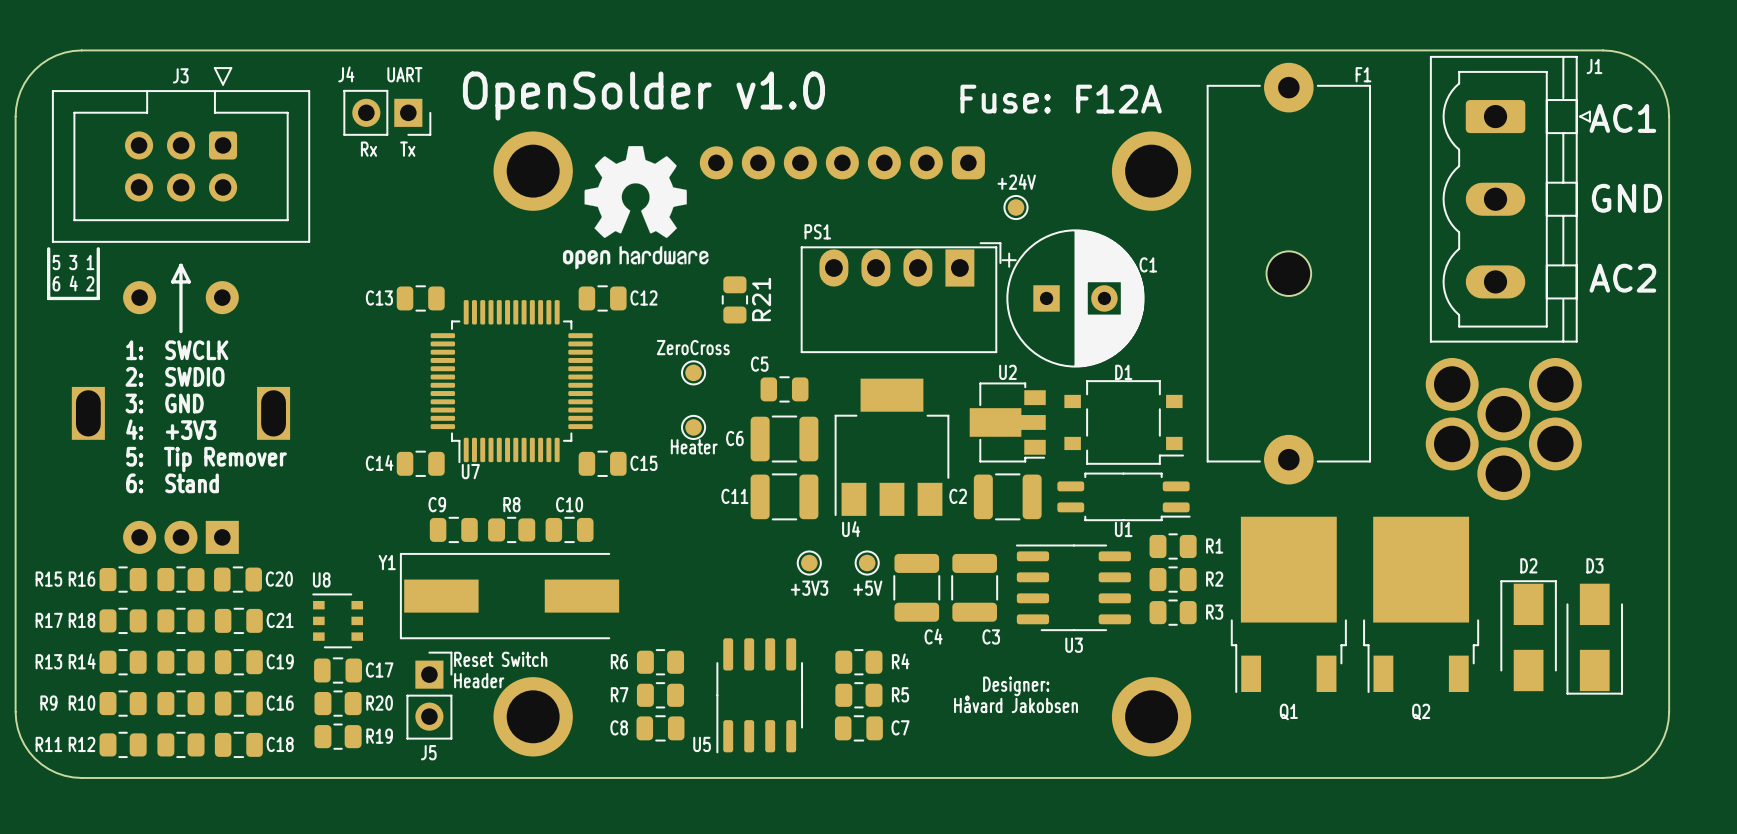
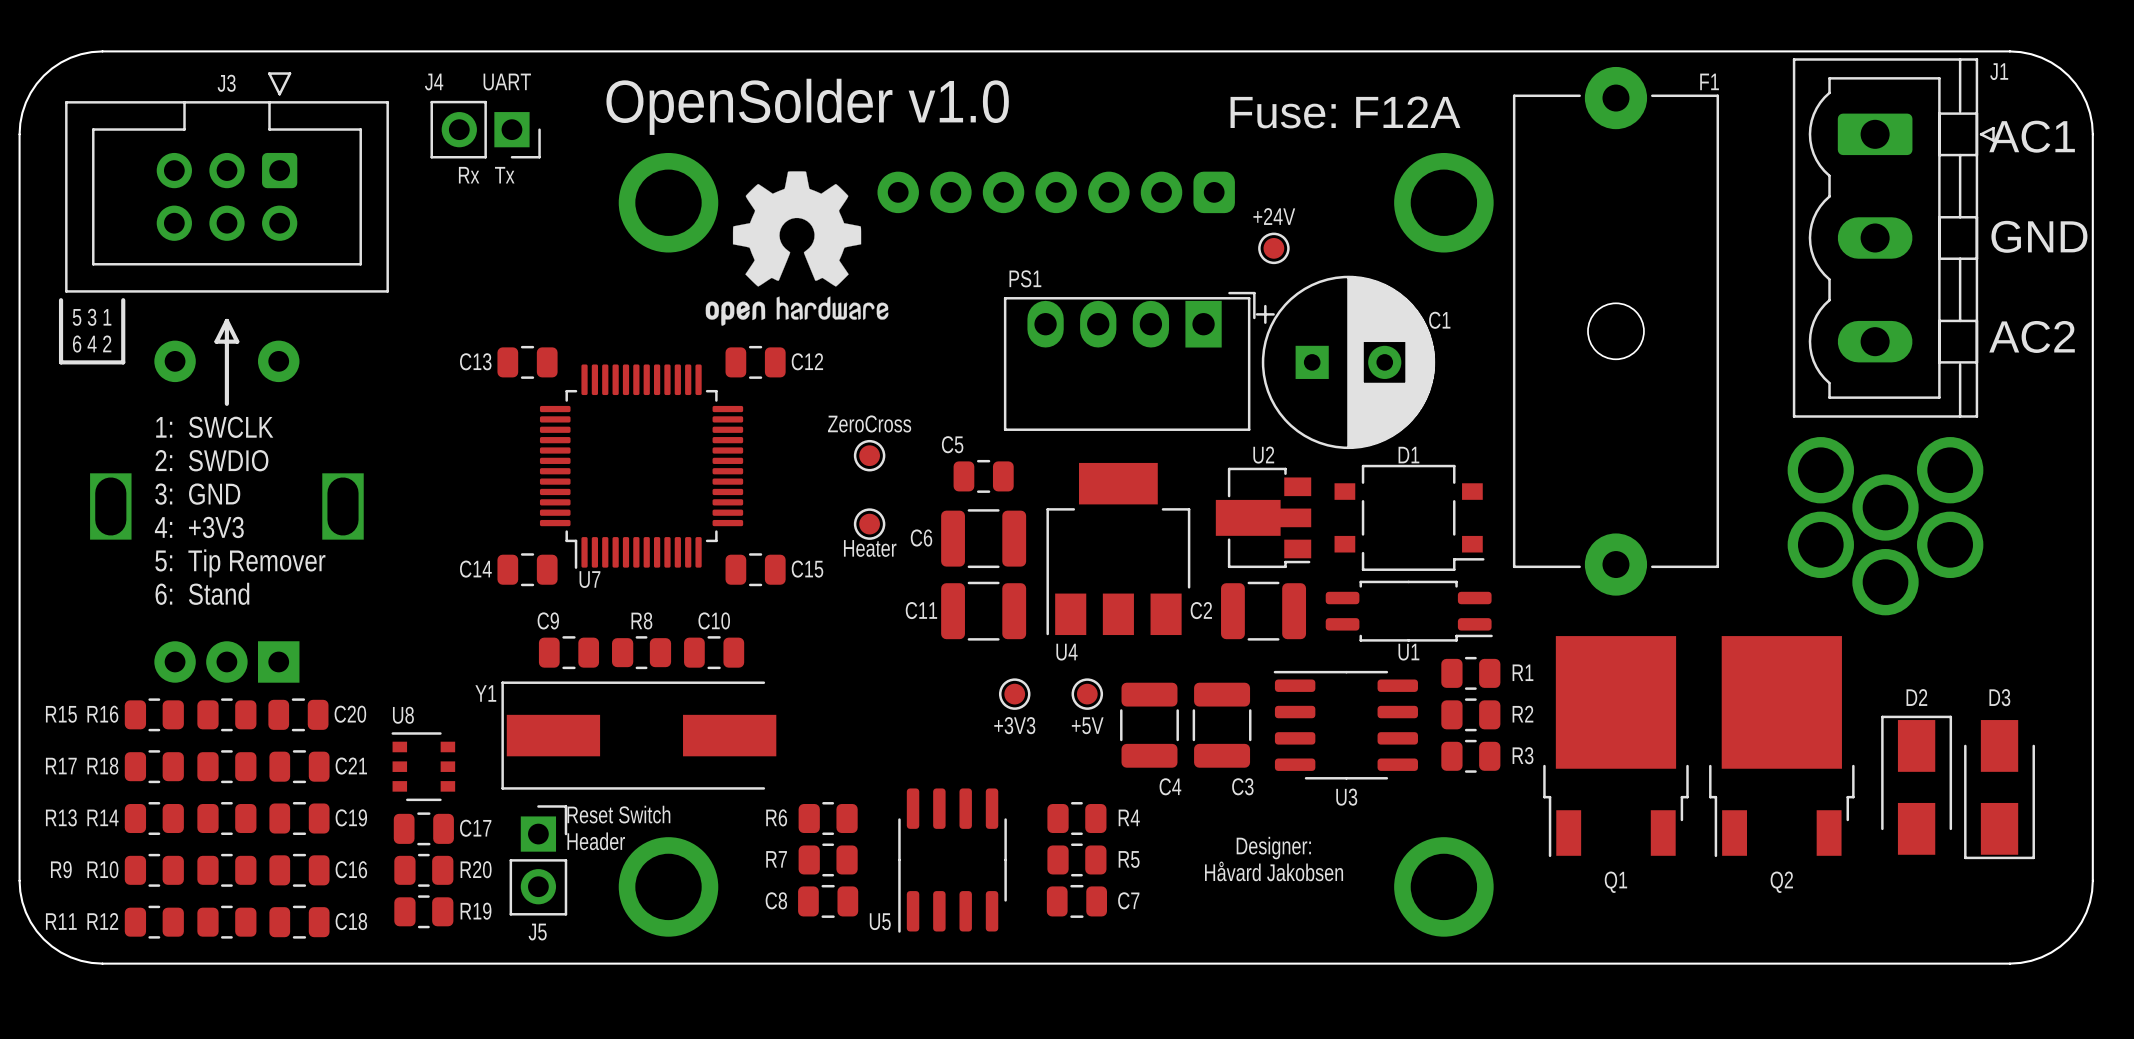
R21: (734, 299) -> none

